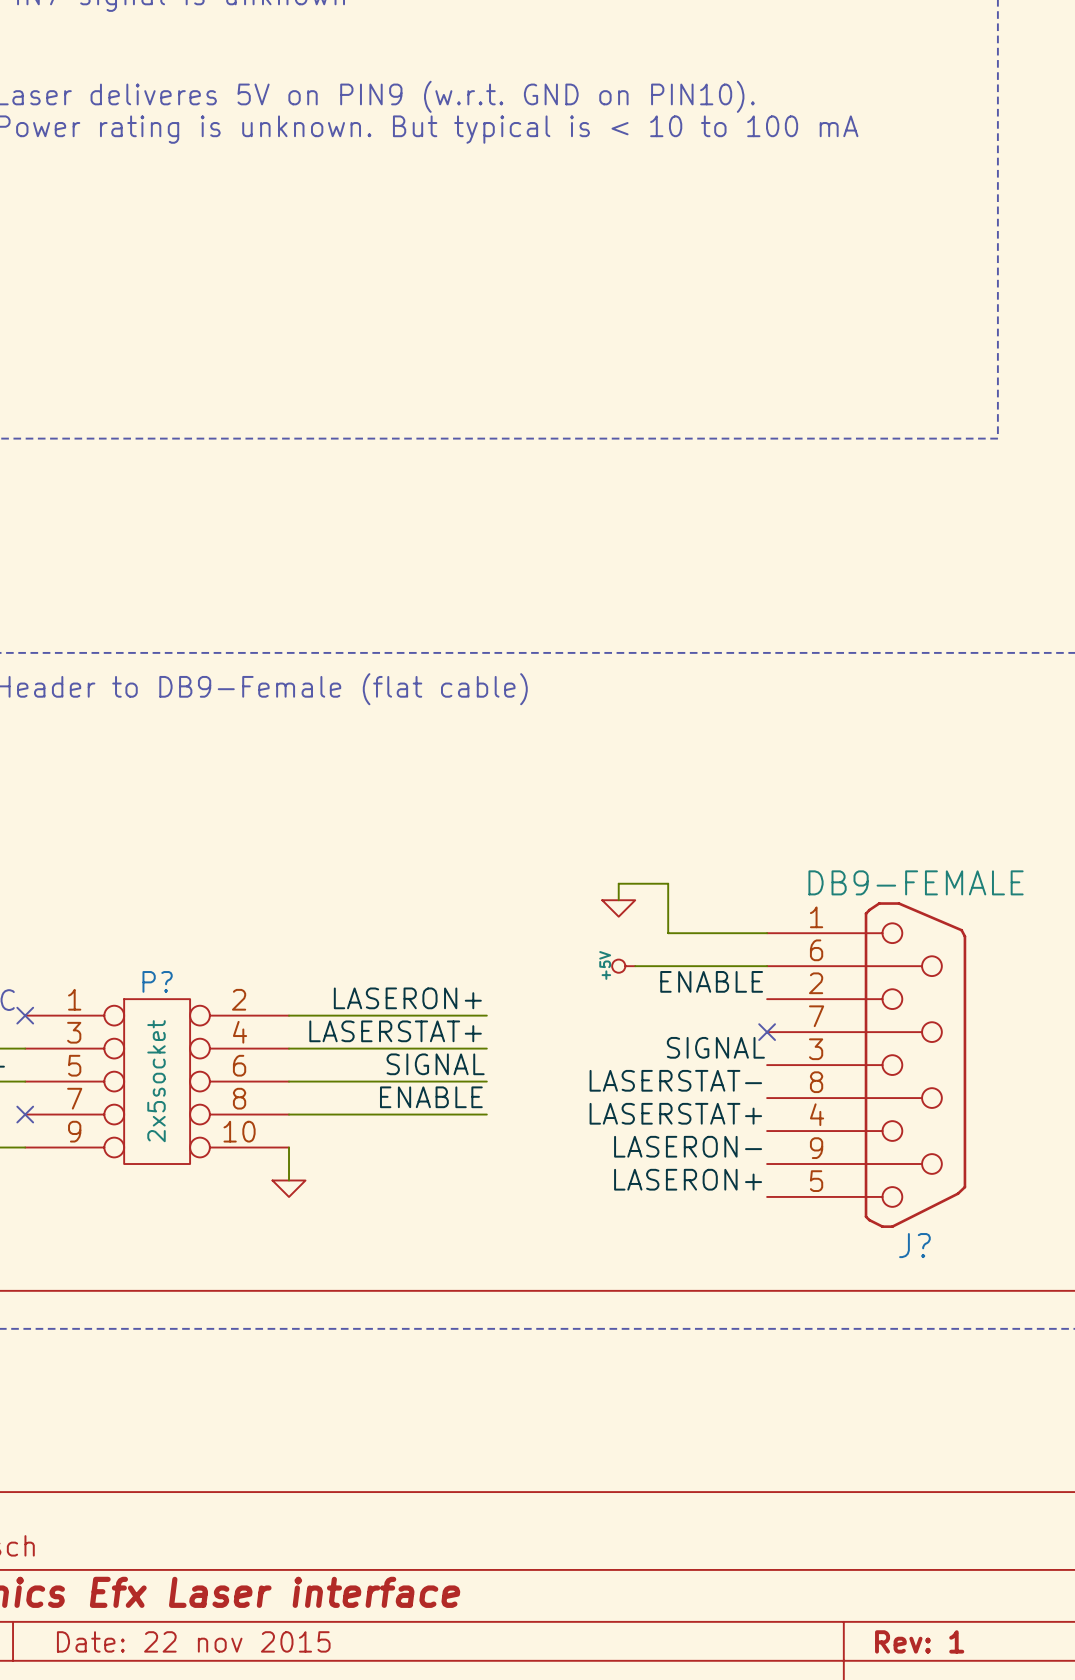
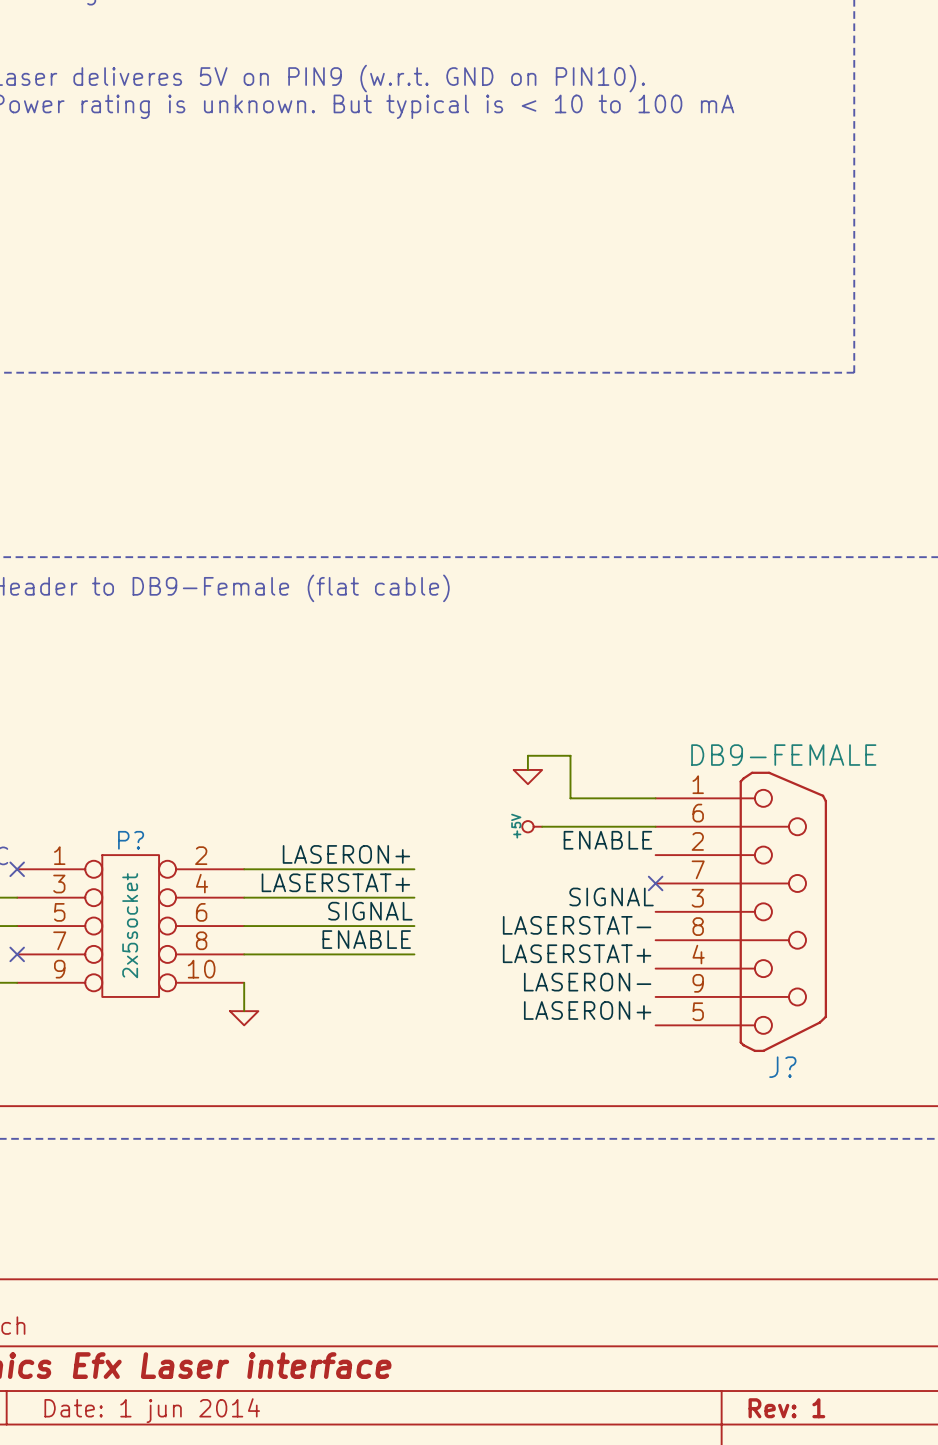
title block: Date: 22 nov 2015 (193, 1641) -> Date: 1 jun 2014 (152, 1410)

